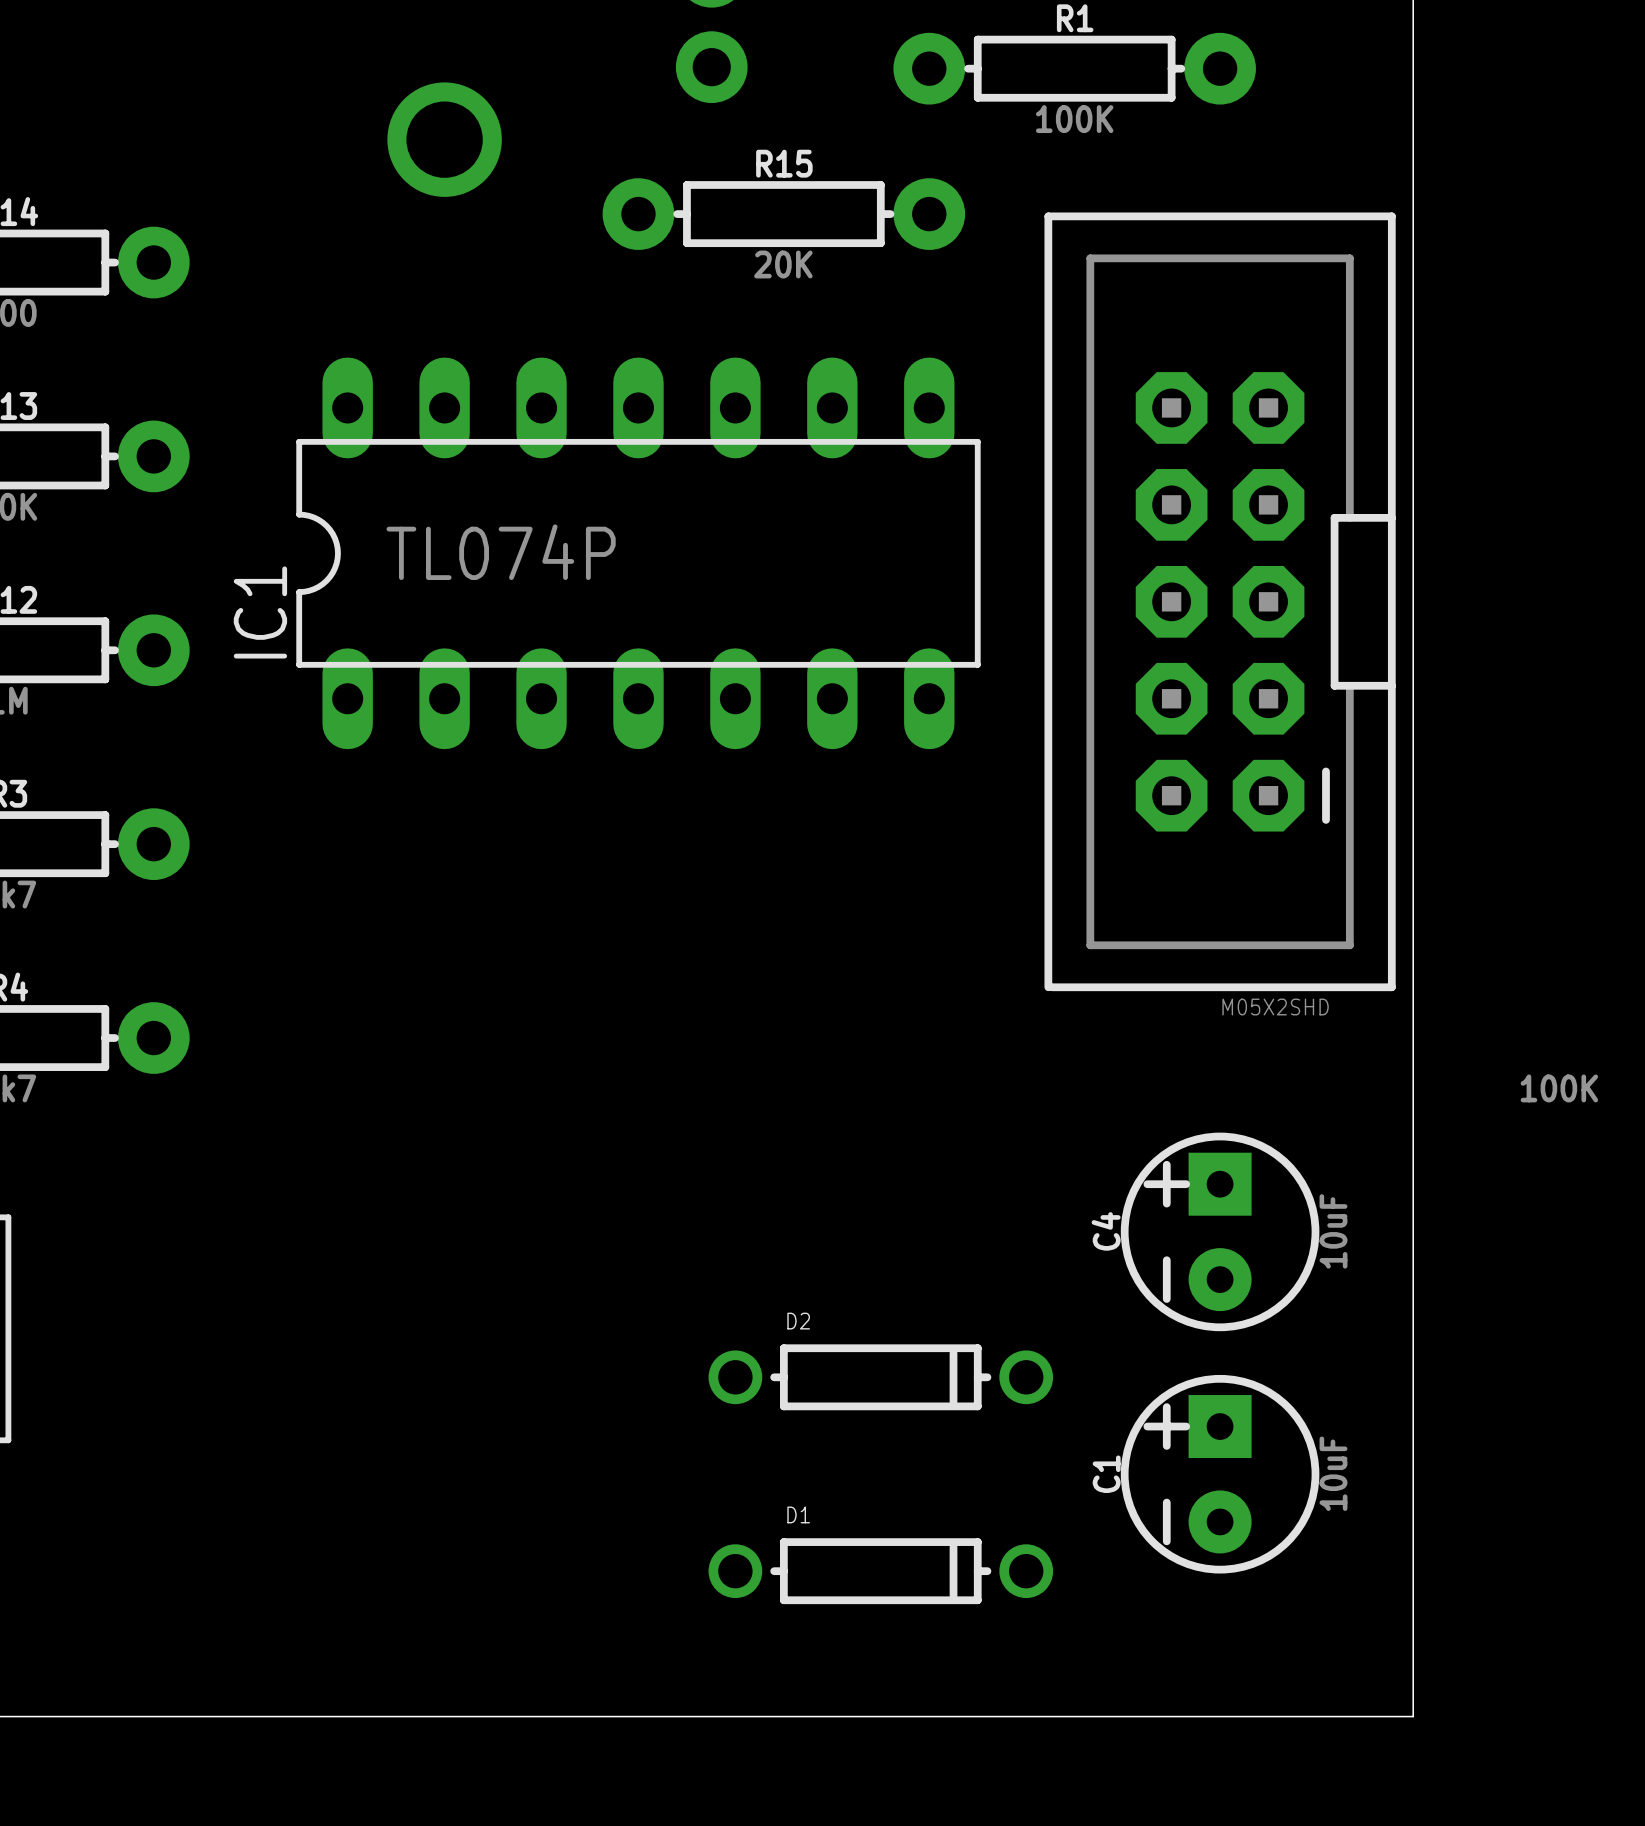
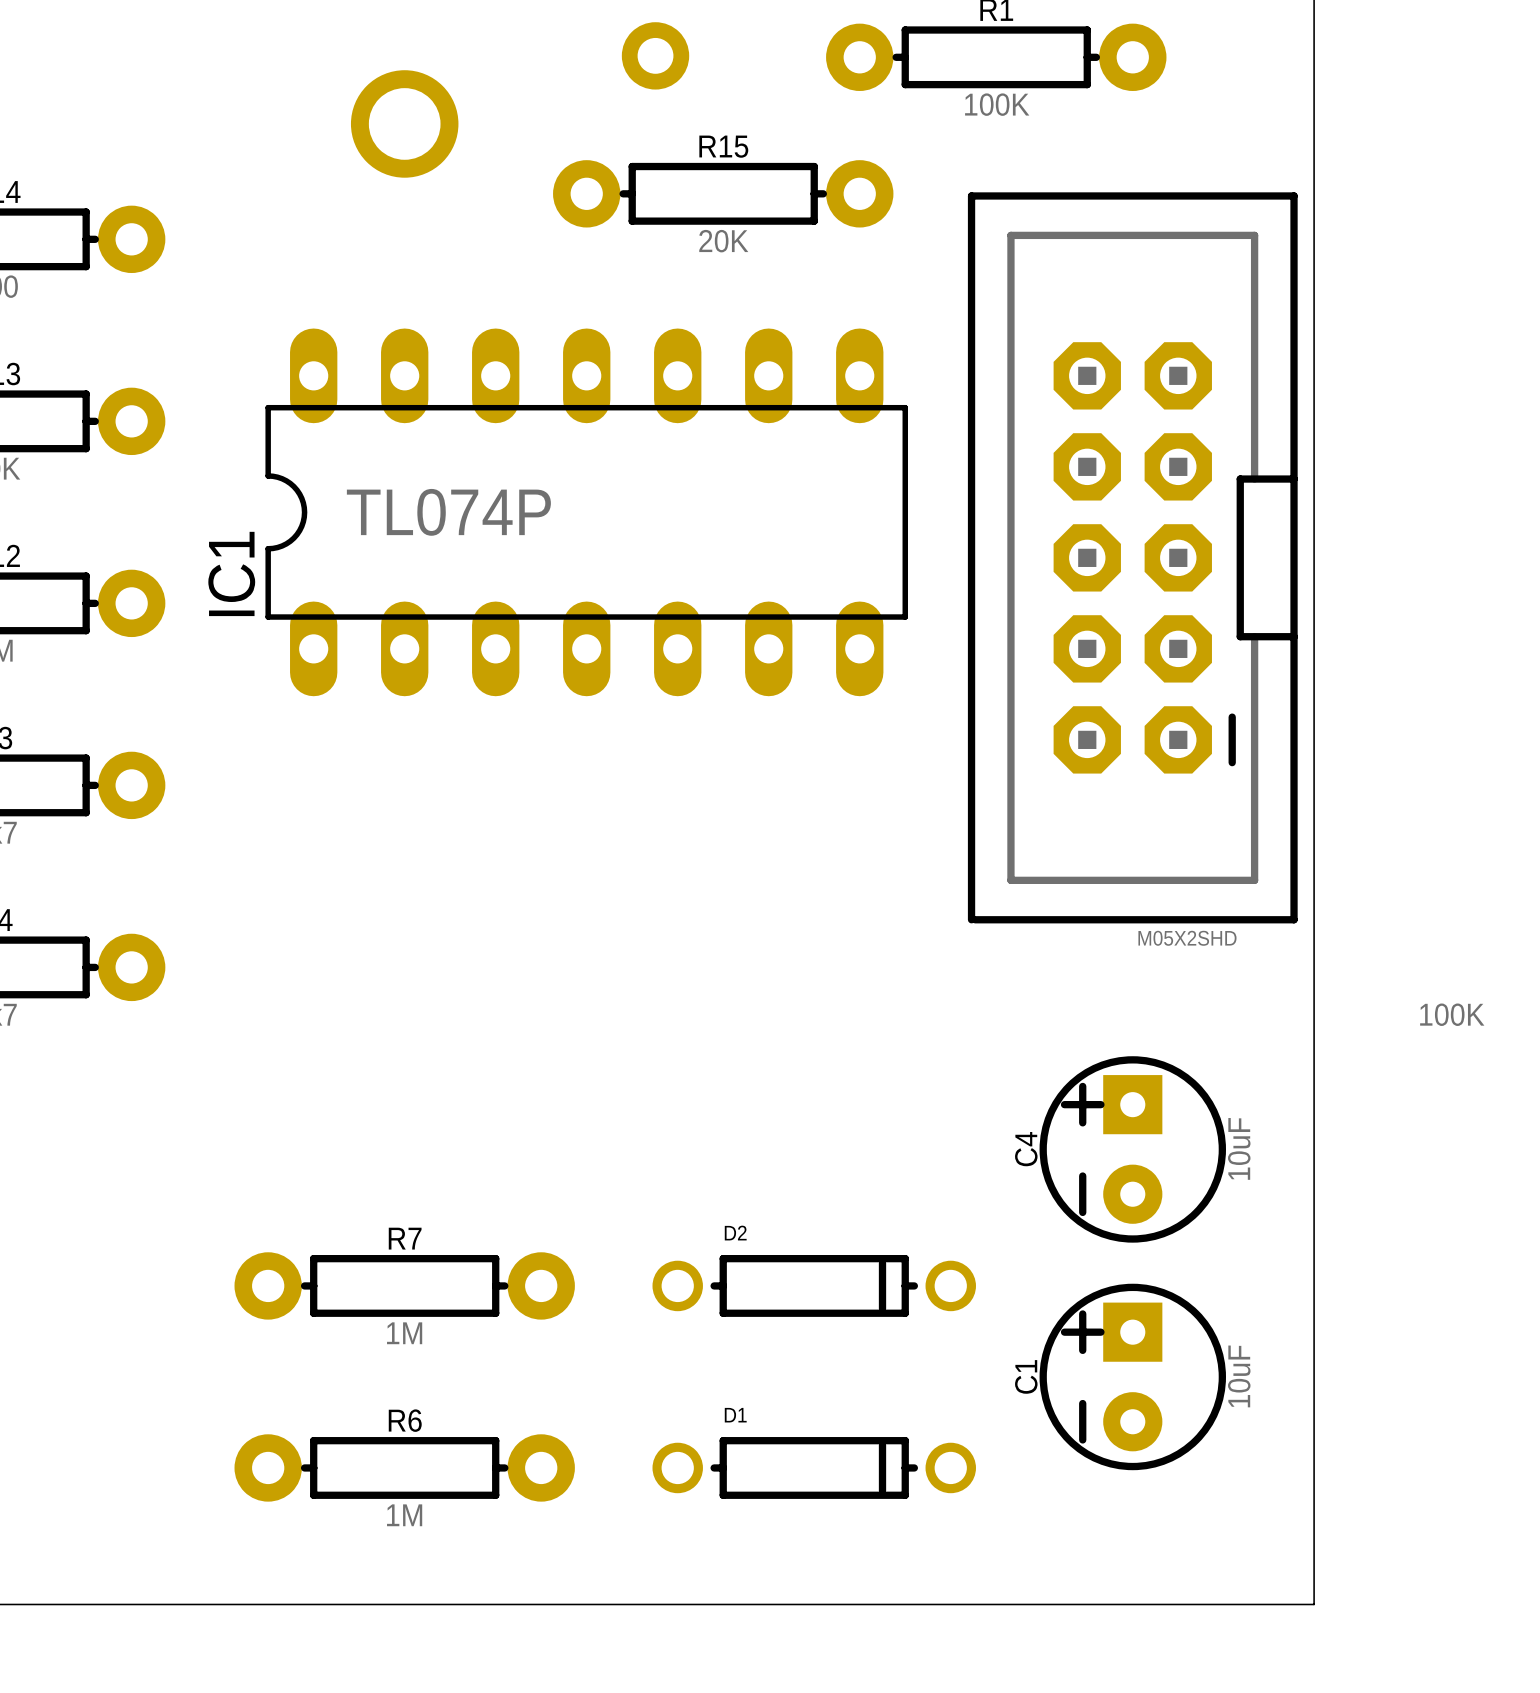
R7: none -> 1M (404, 1285)
R6: none -> 1M (404, 1467)

